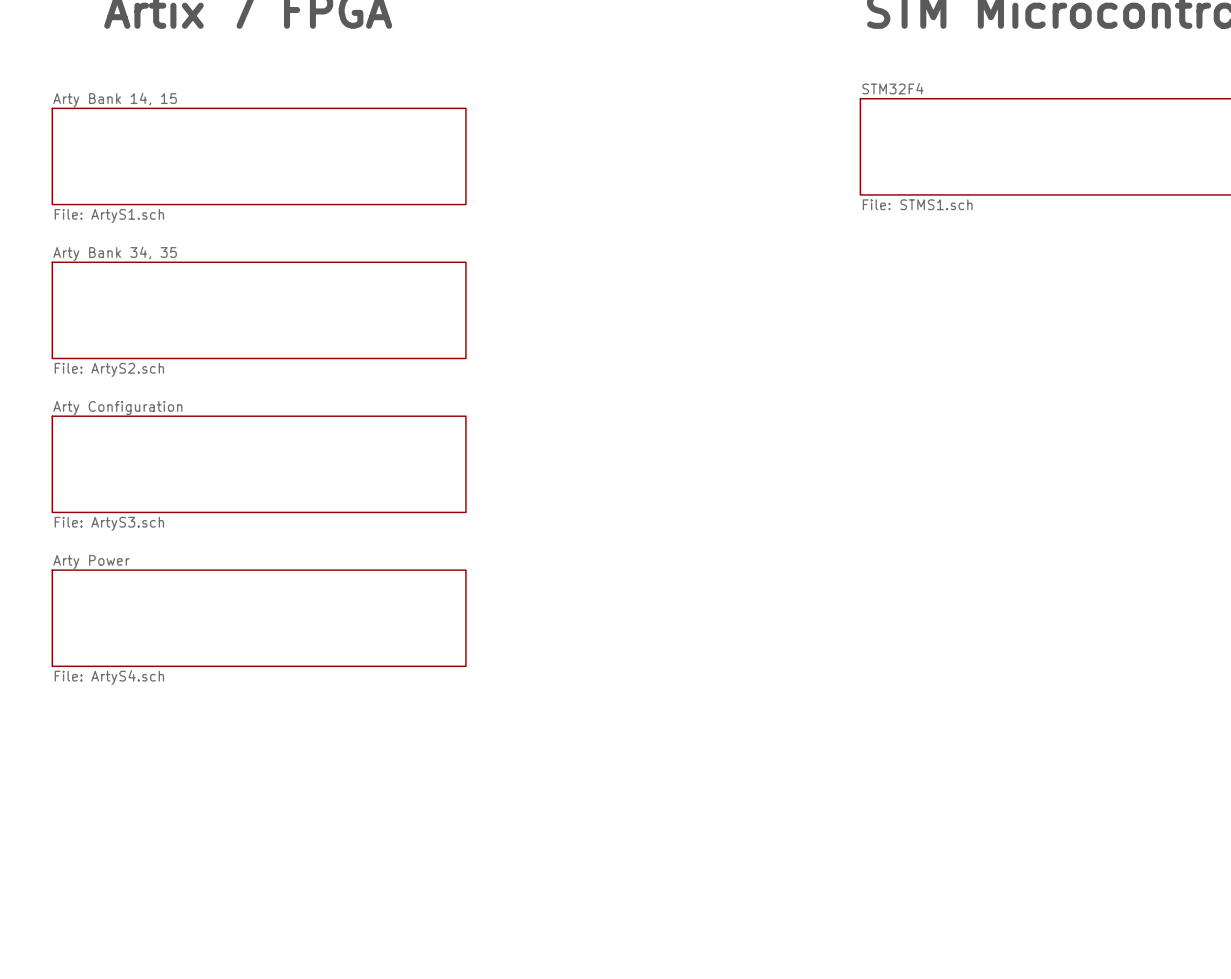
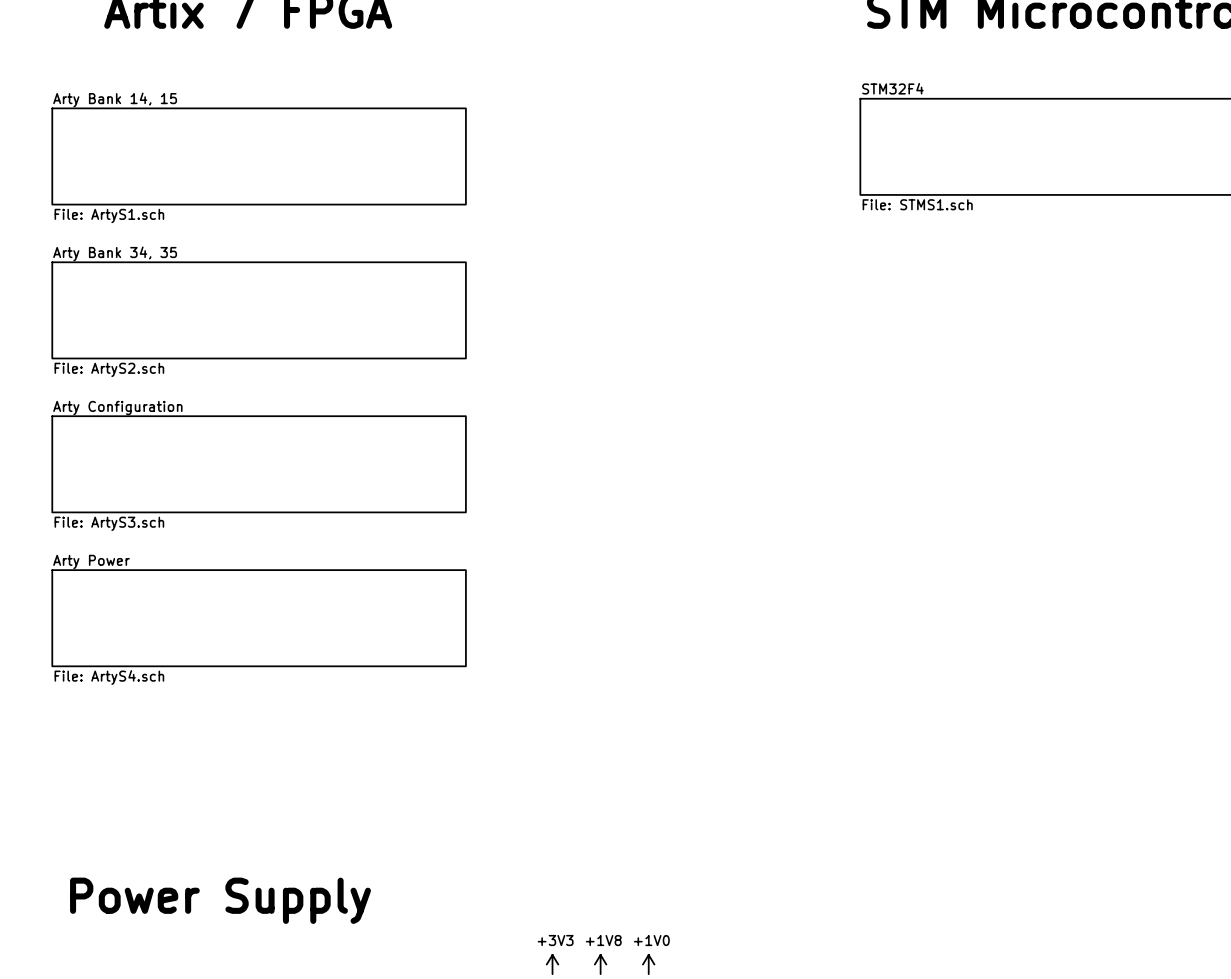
text: none -> Power Supply (220, 900)
power symbol: none -> +3V3 (552, 964)
power symbol: none -> +1V8 (600, 964)
power symbol: none -> +1V0 (648, 964)

